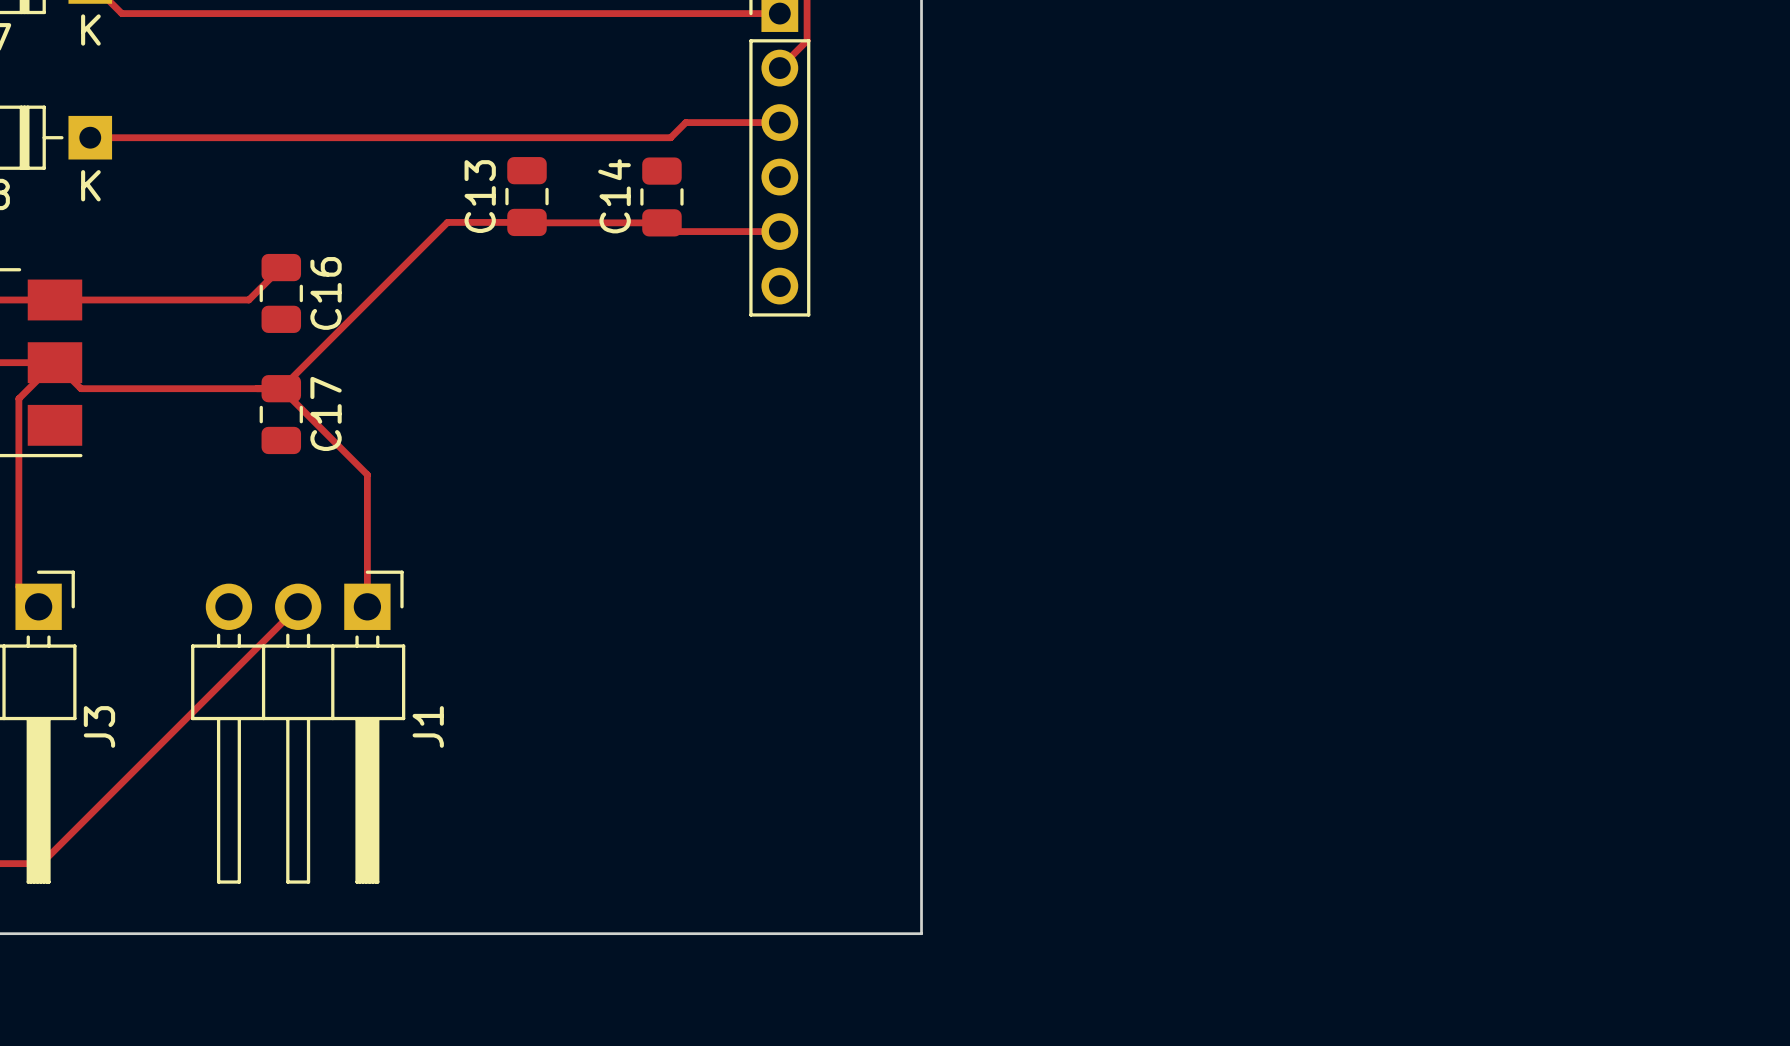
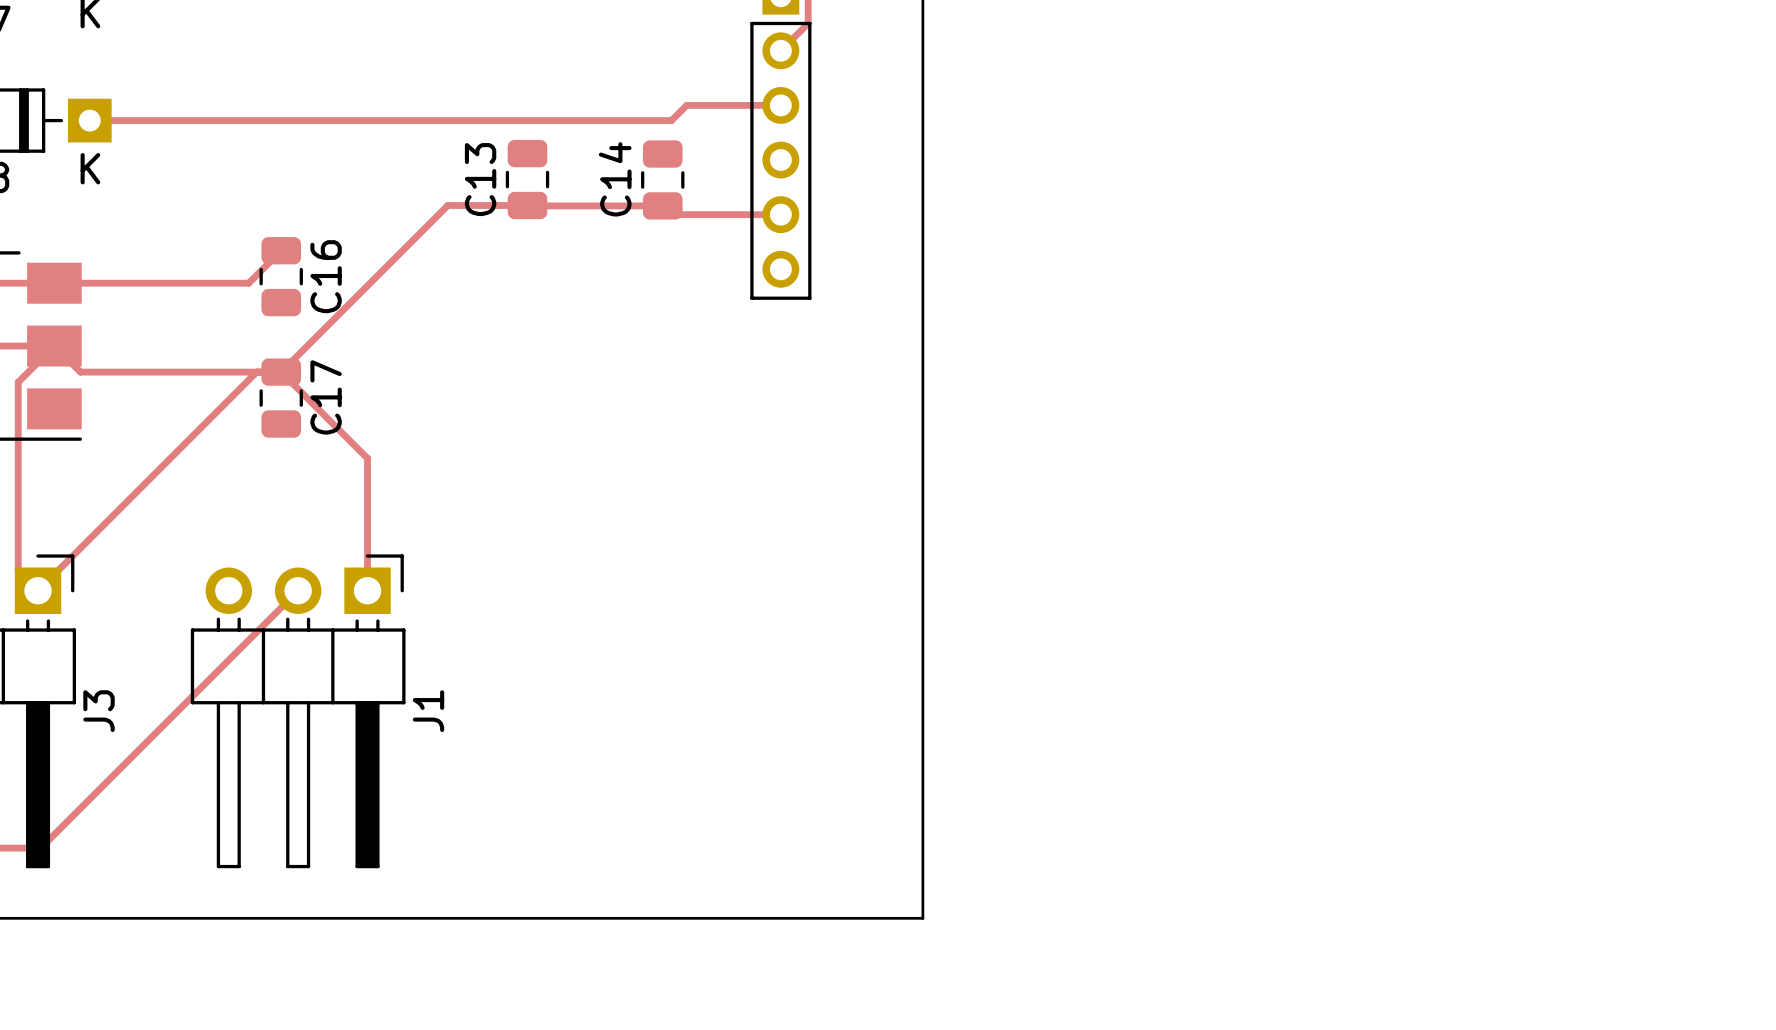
track: none -> (256, 372) (38, 590)

